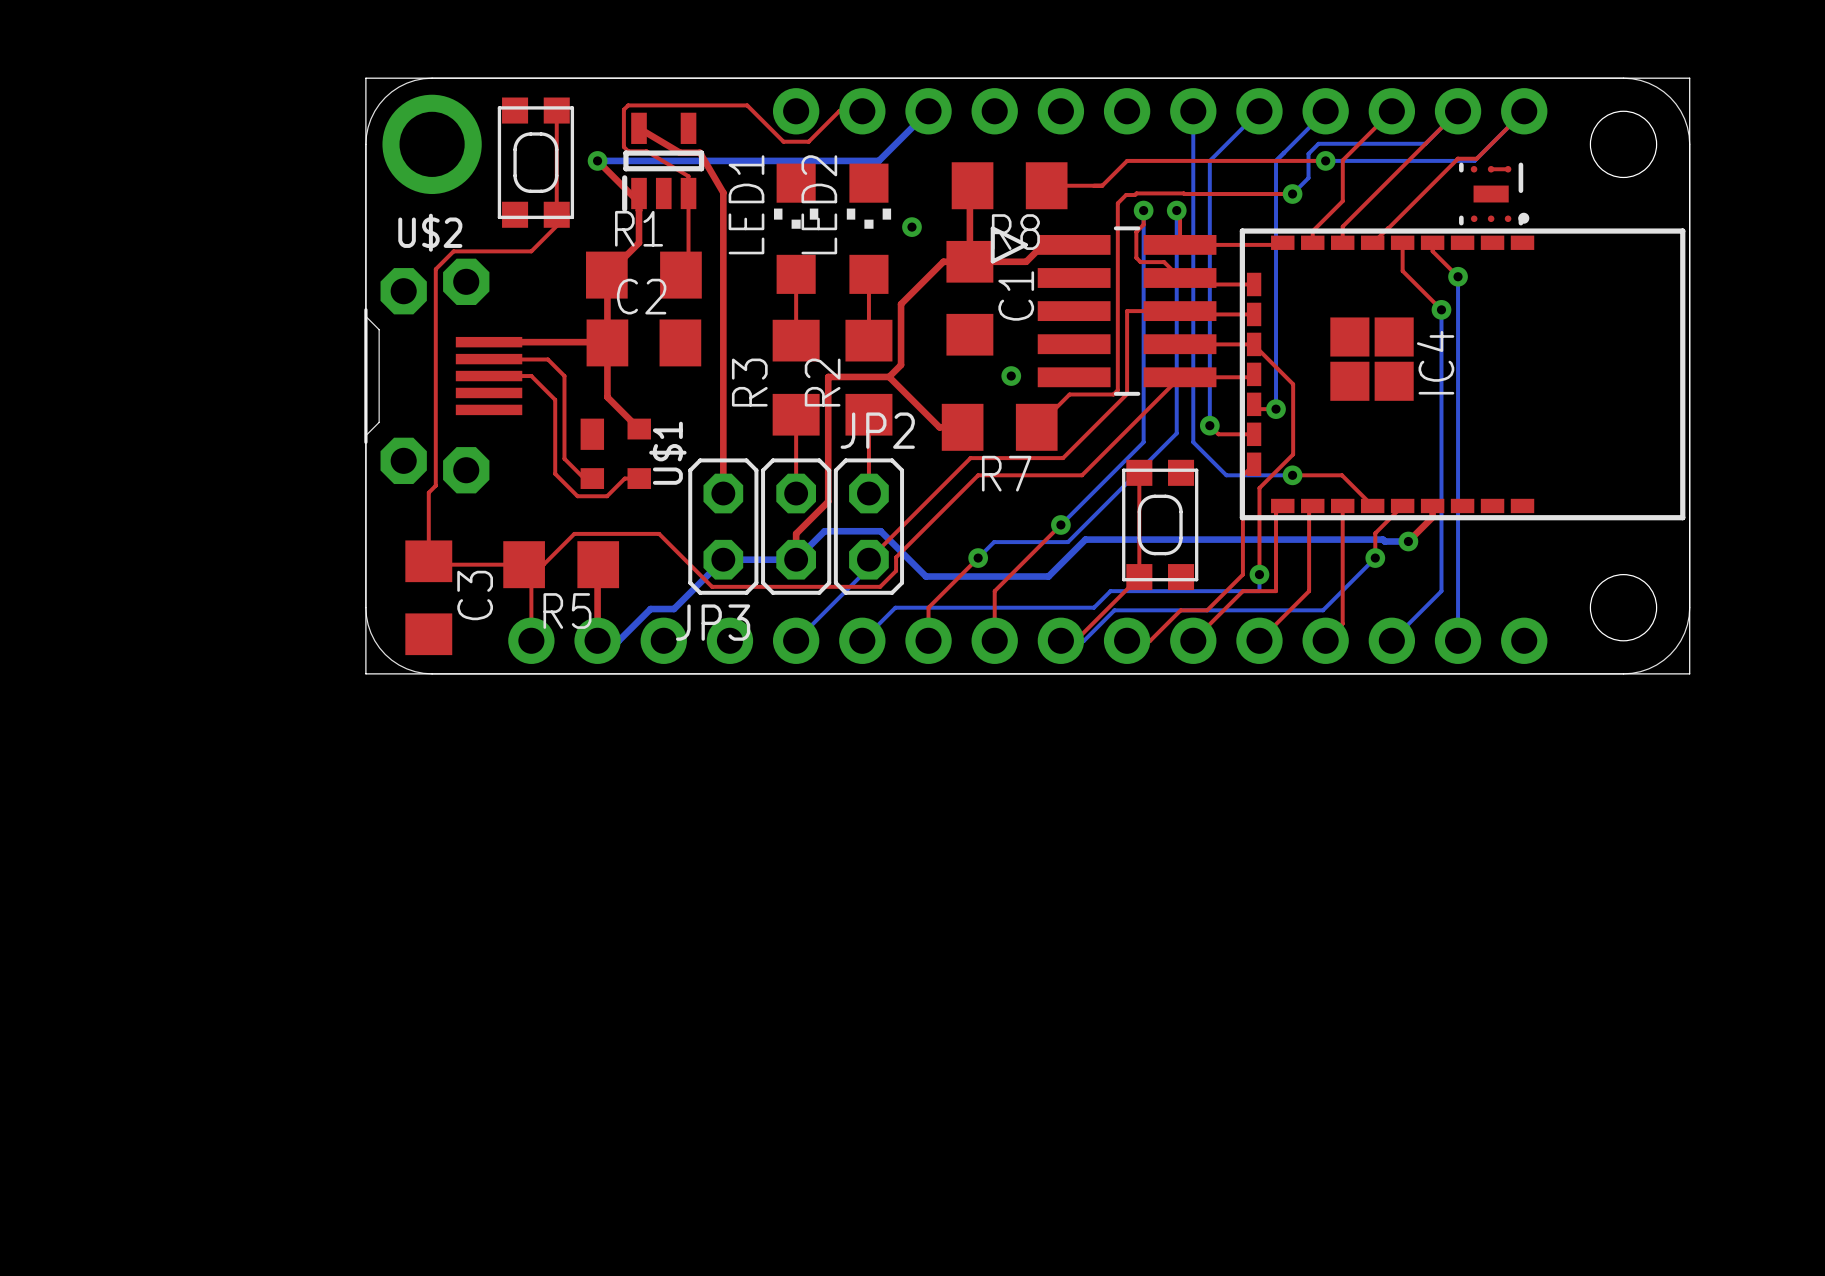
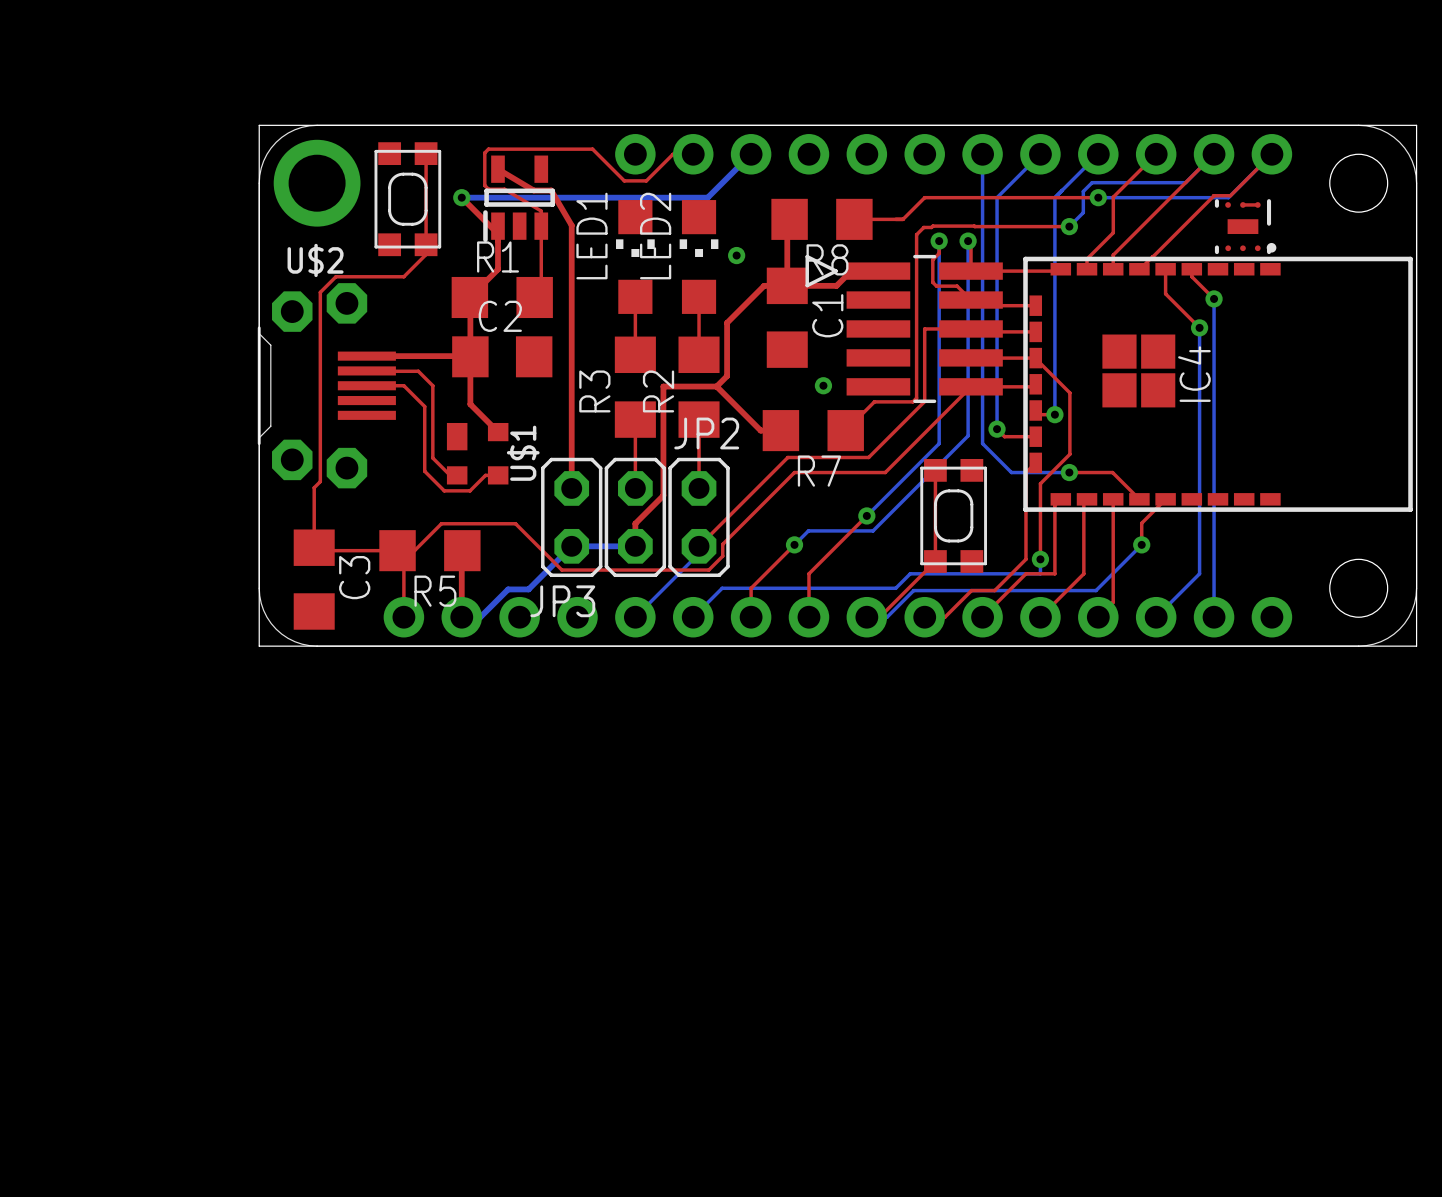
top track: (1432, 505) (1432, 517) (1408, 541) -> none
bottom track: (1408, 541) (1384, 541) (1382, 539) (1085, 539) (1048, 576) (926, 576) (880, 531) (824, 531) (796, 559) -> none
via: (1408, 541) -> none

